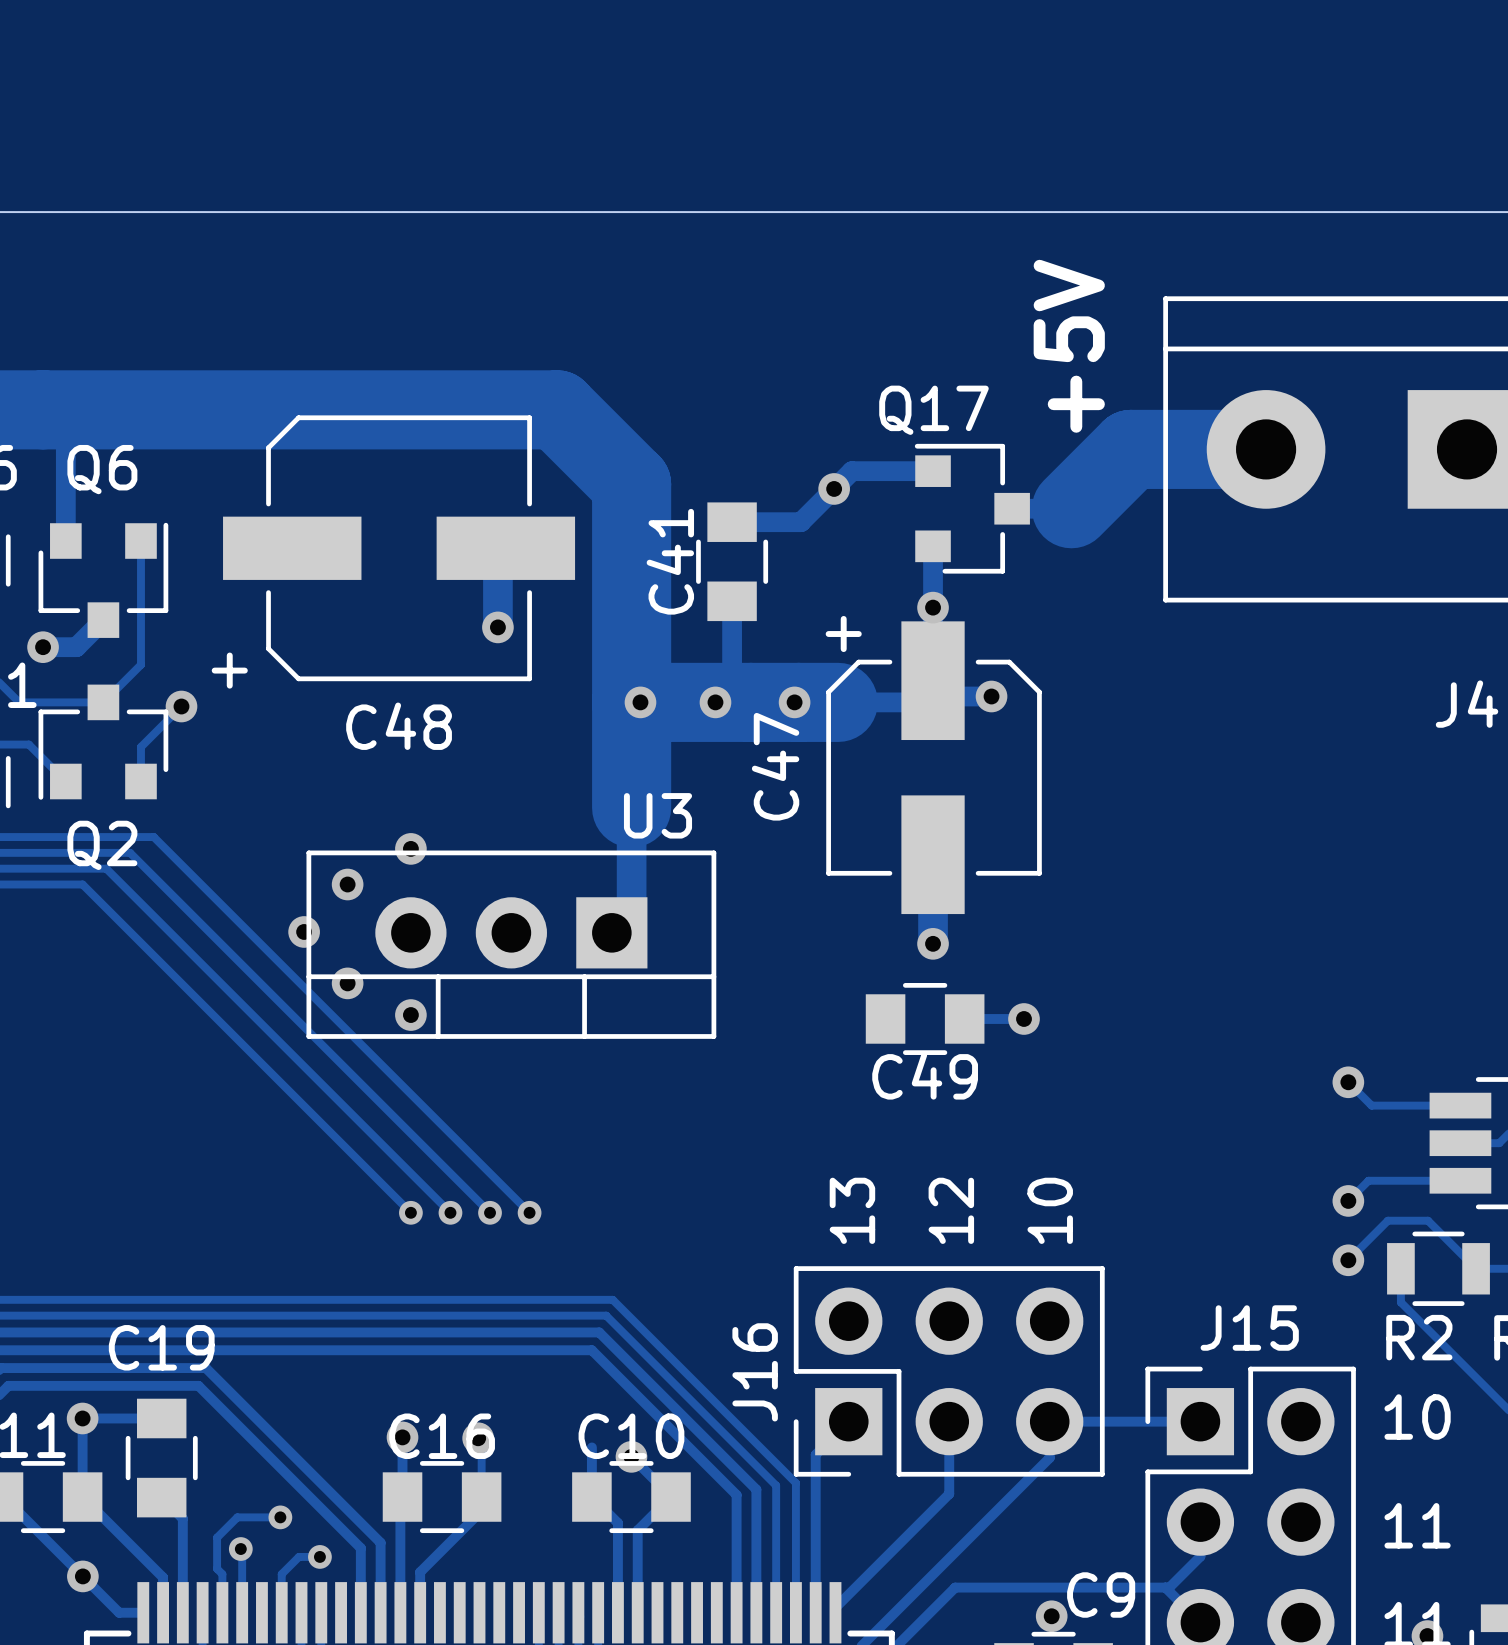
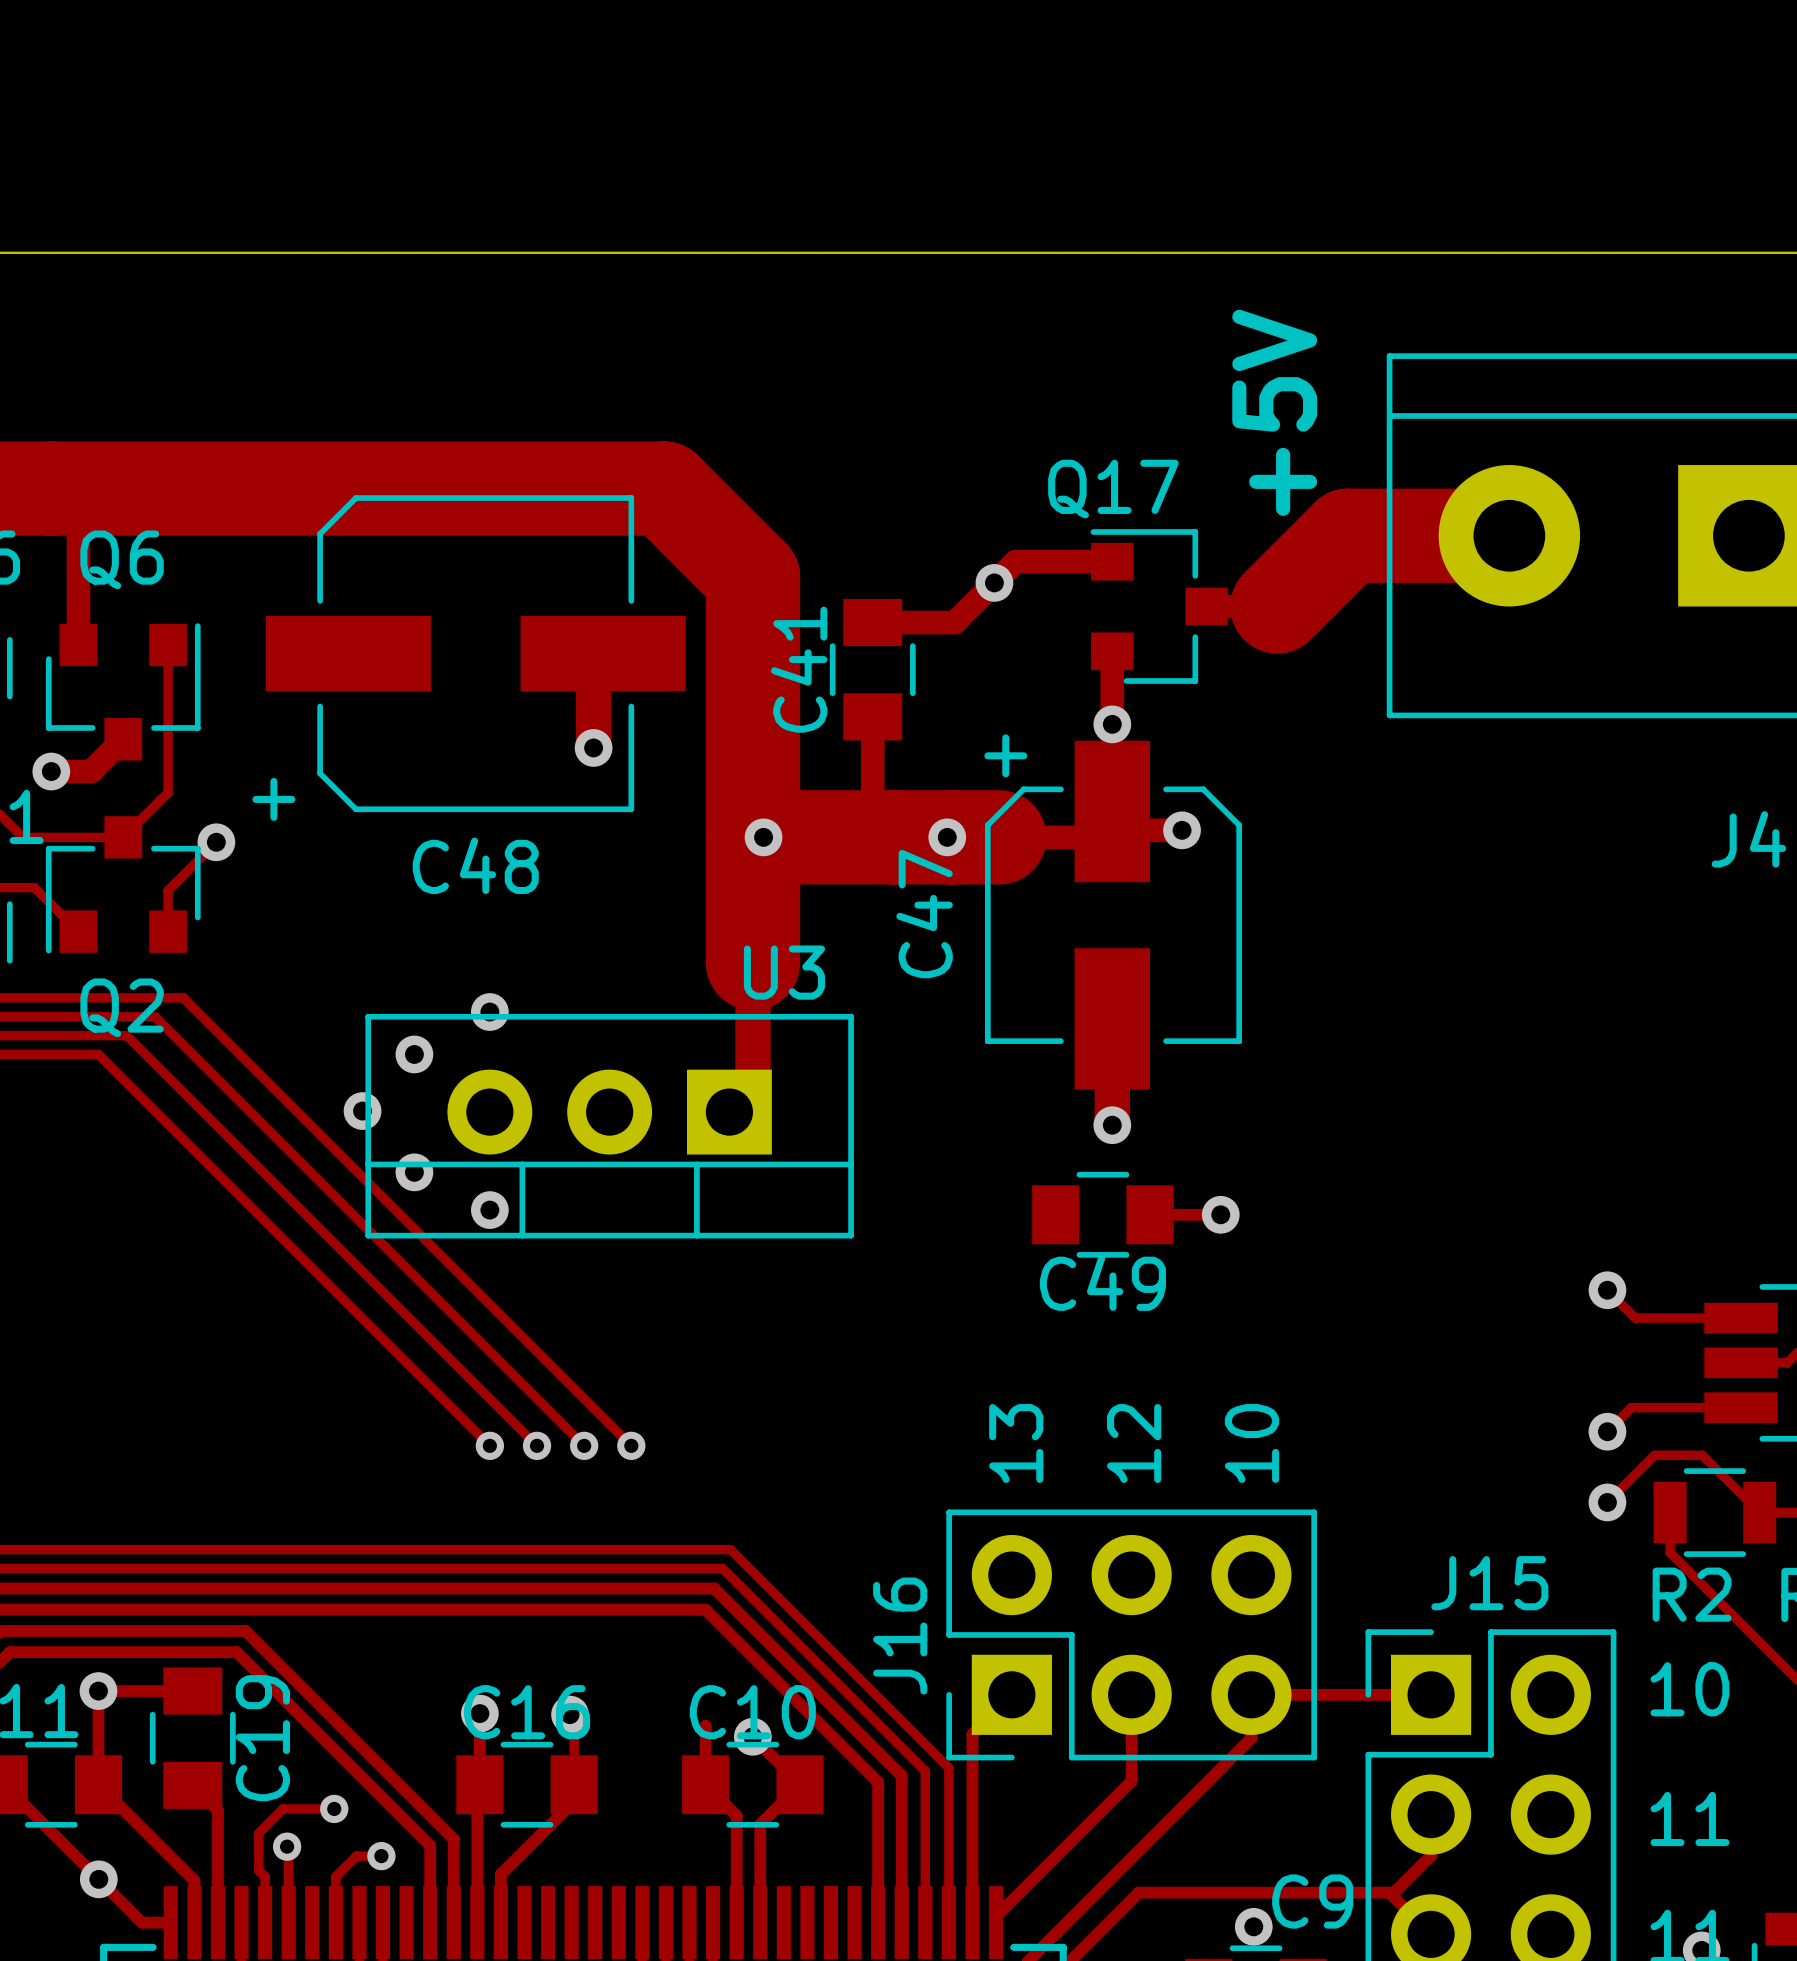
via: (715, 702) -> none
C19 name rotation: 0° (161, 1347) -> 90° counterclockwise (262, 1738)

